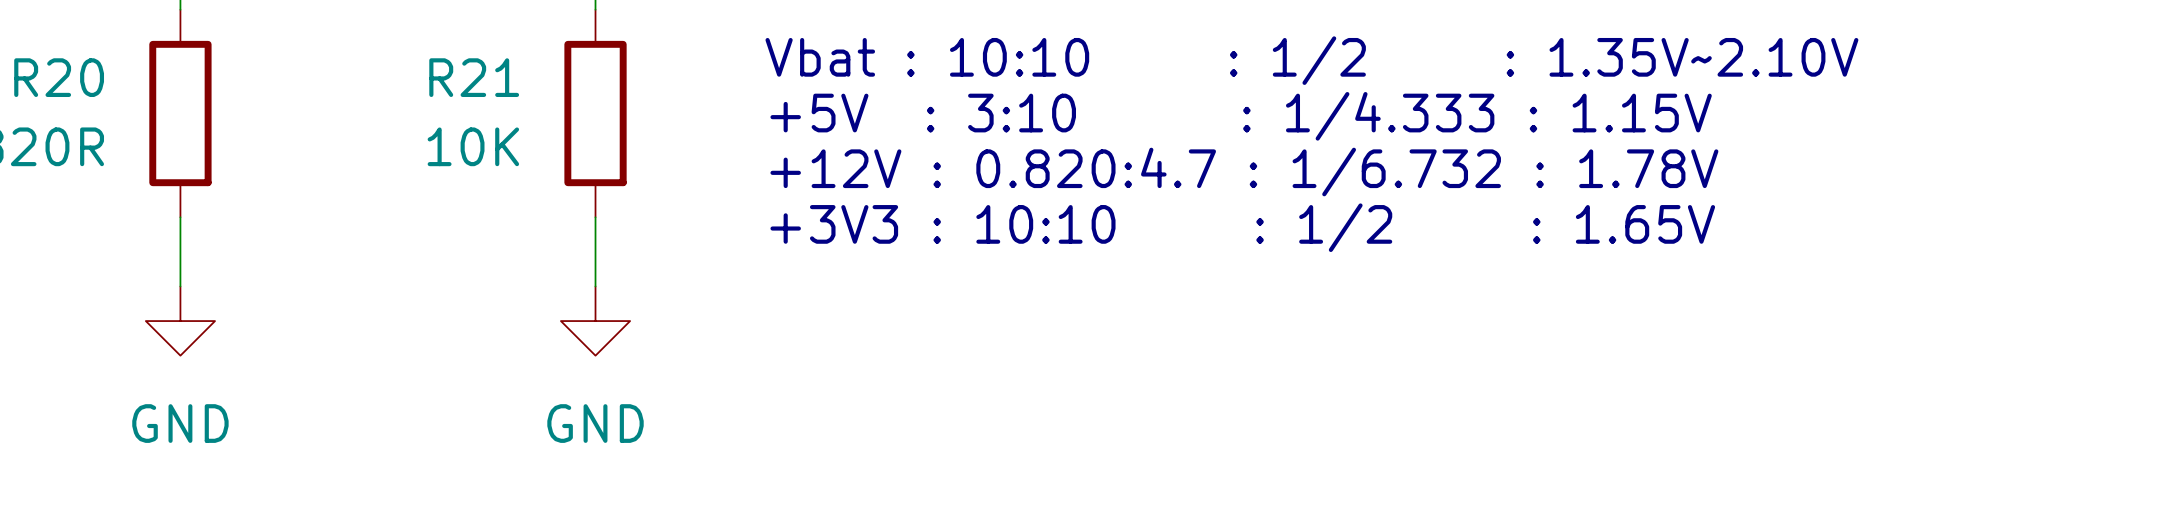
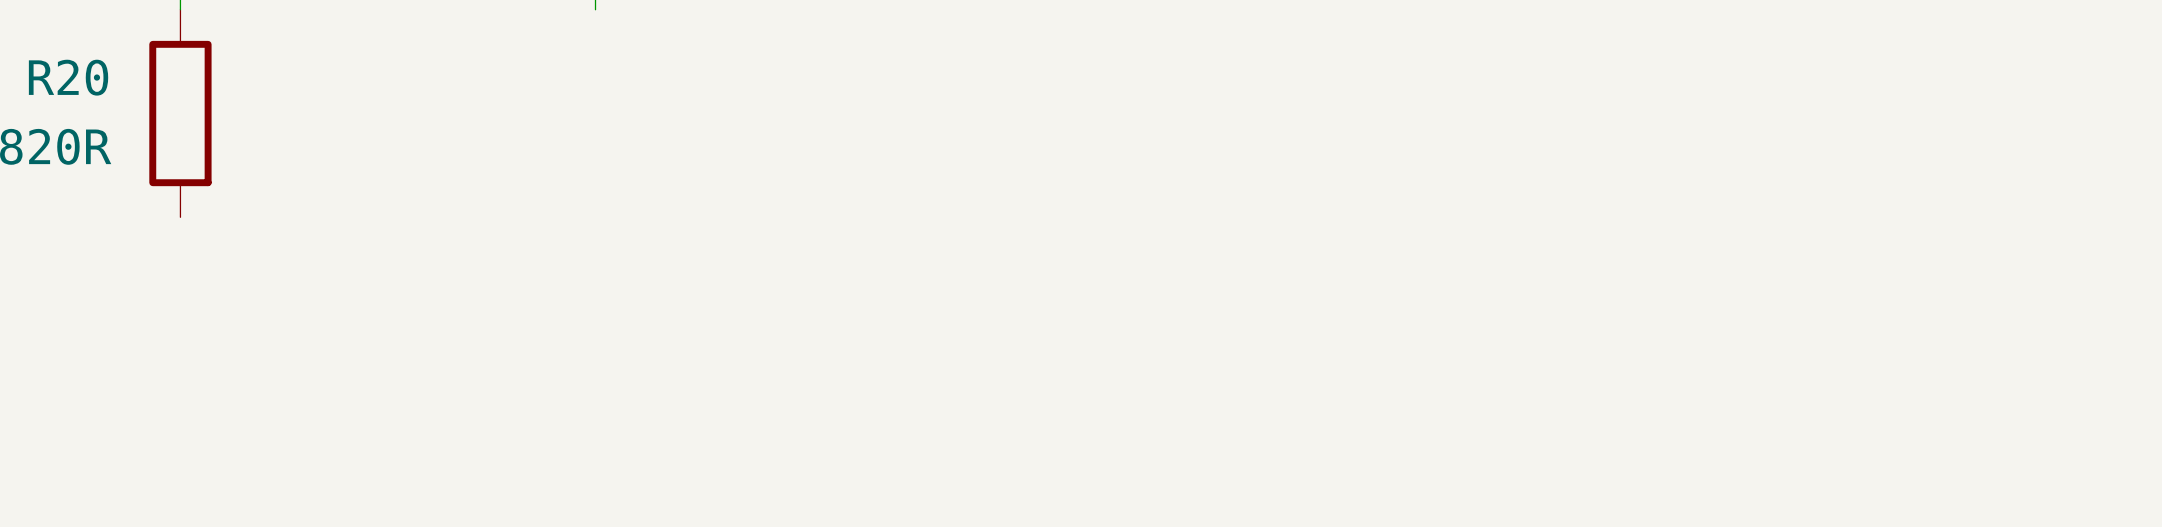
text: Vbat : 10:10 : 1/2 : 1.35V~2.10V (1311, 60) -> none
R21: 10K (595, 113) -> none
text: +5V : 3:10 : 1/4.333 : 1.15V (1241, 116) -> none
text: +12V : 0.820:4.7 : 1/6.732 : 1.78V (1244, 172) -> none
wire: (180, 217) (180, 286) -> none
wire: (595, 217) (595, 286) -> none
text: +3V3 : 10:10 : 1/2 : 1.65V (1242, 227) -> none
power symbol: GND (180, 321) -> none
power symbol: GND (595, 321) -> none

